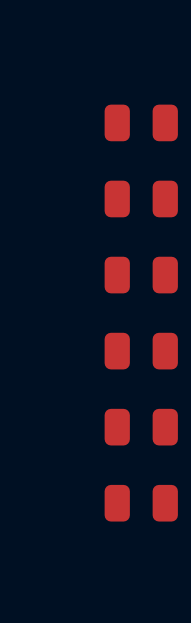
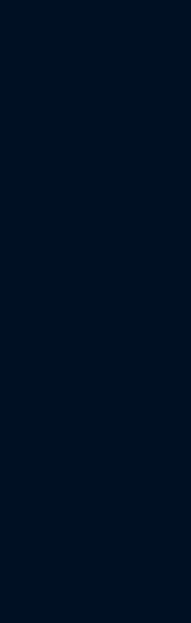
part: (141, 122) -> none
part: (141, 198) -> none
part: (141, 275) -> none
part: (141, 351) -> none
part: (141, 427) -> none
part: (141, 503) -> none

